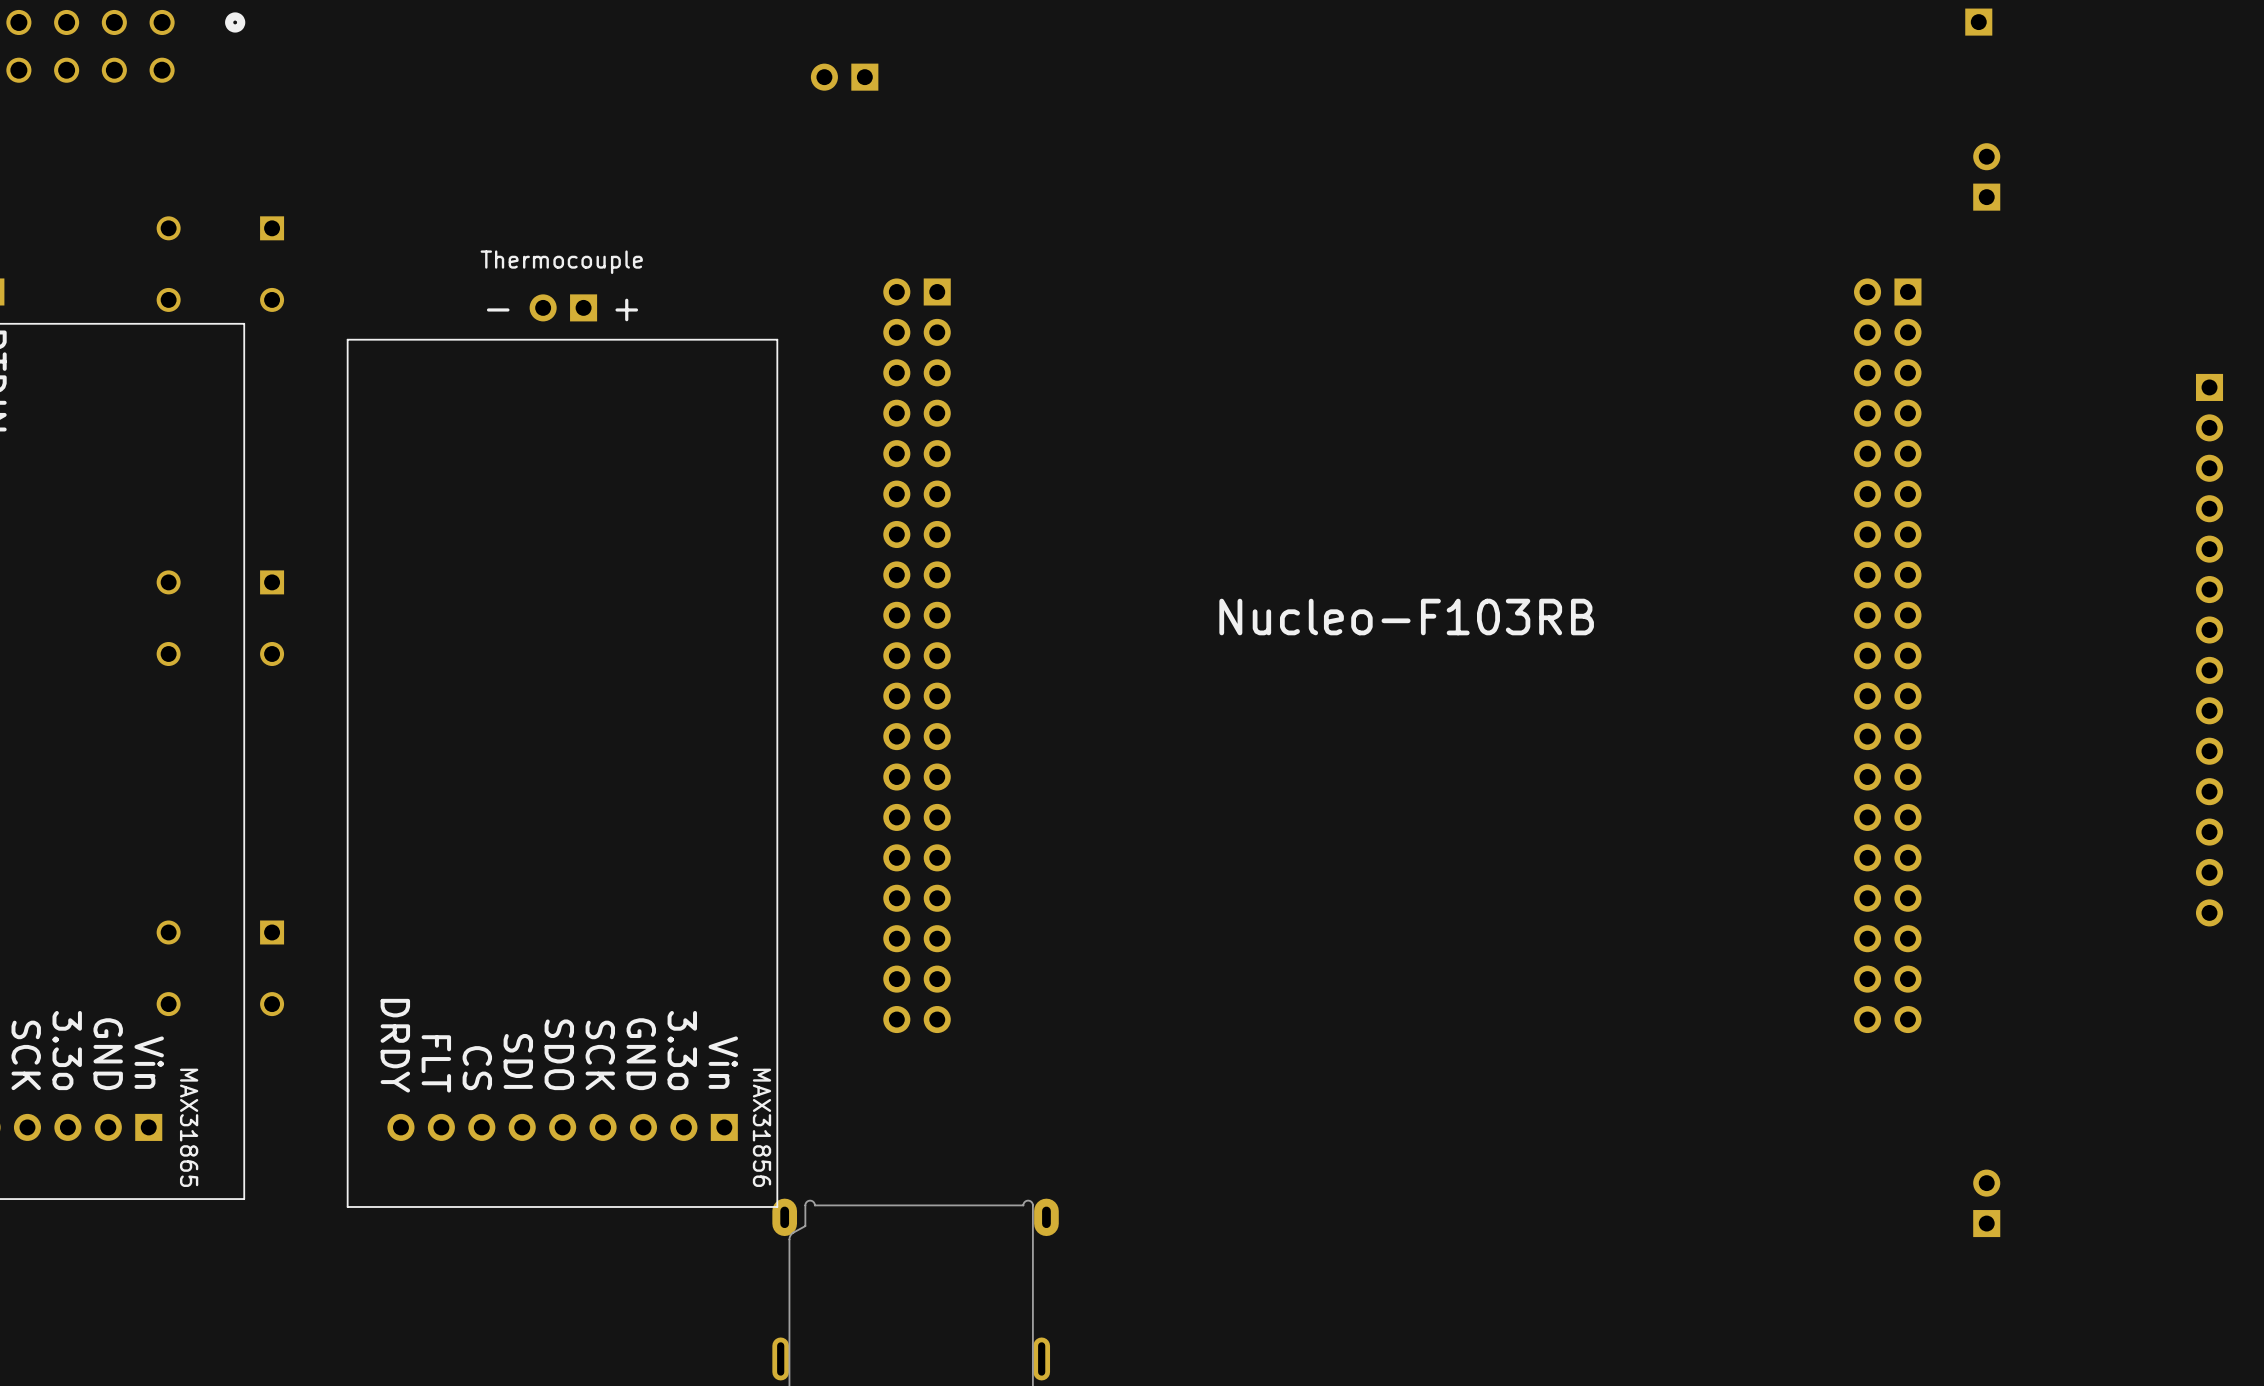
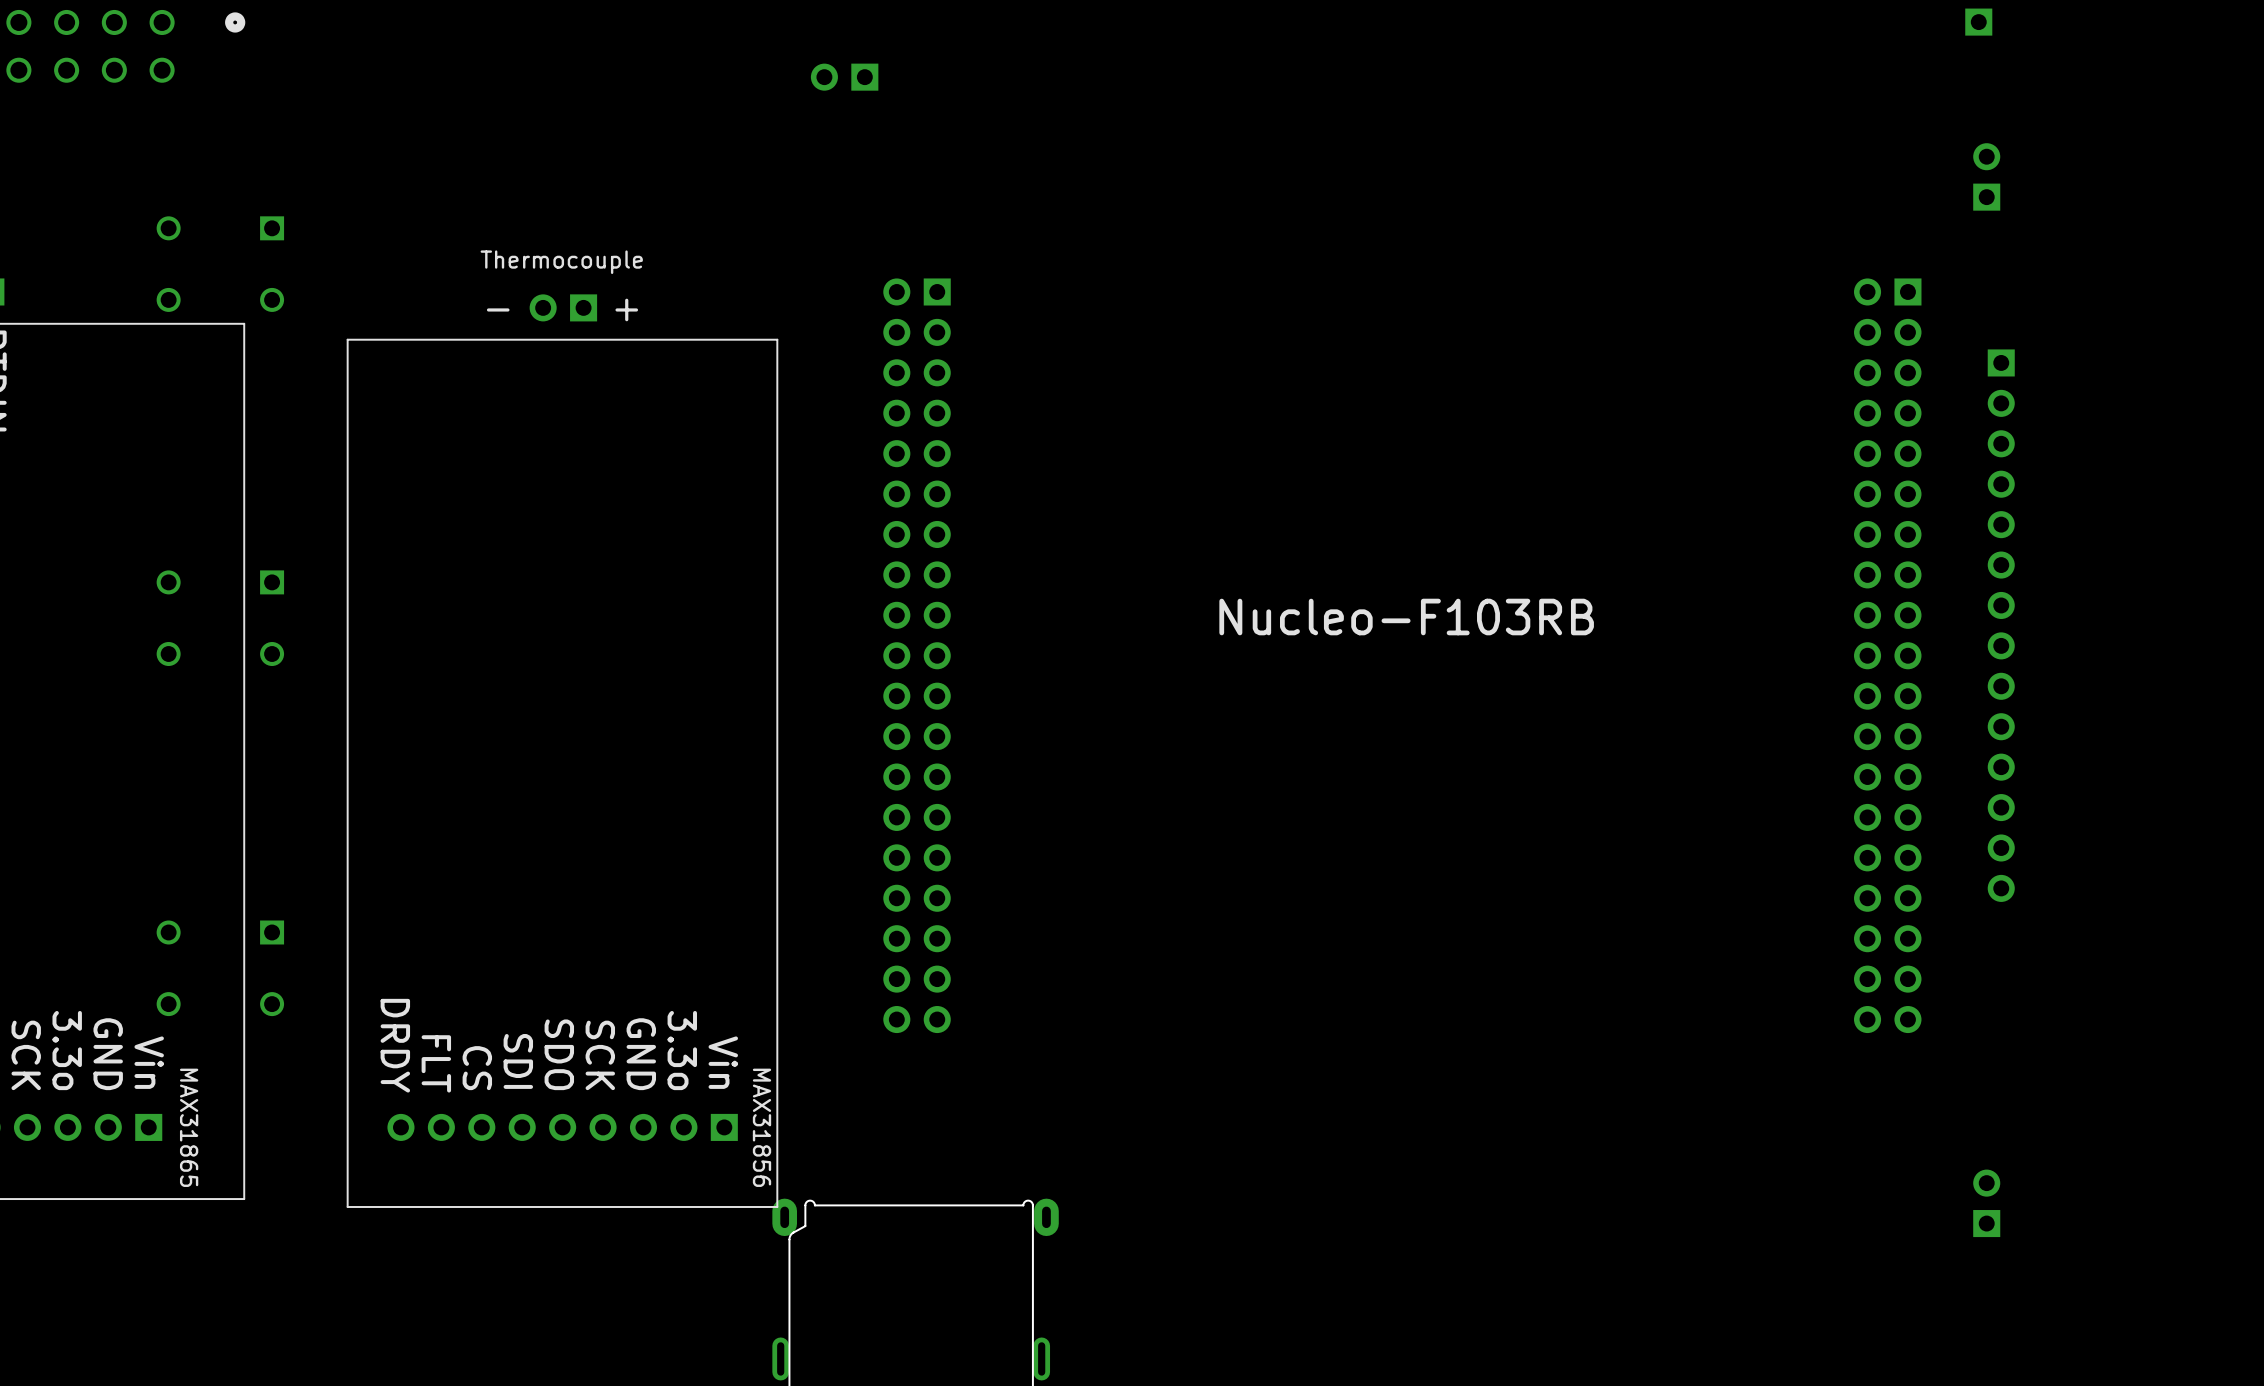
part position: (2209, 650) -> (2001, 625)

